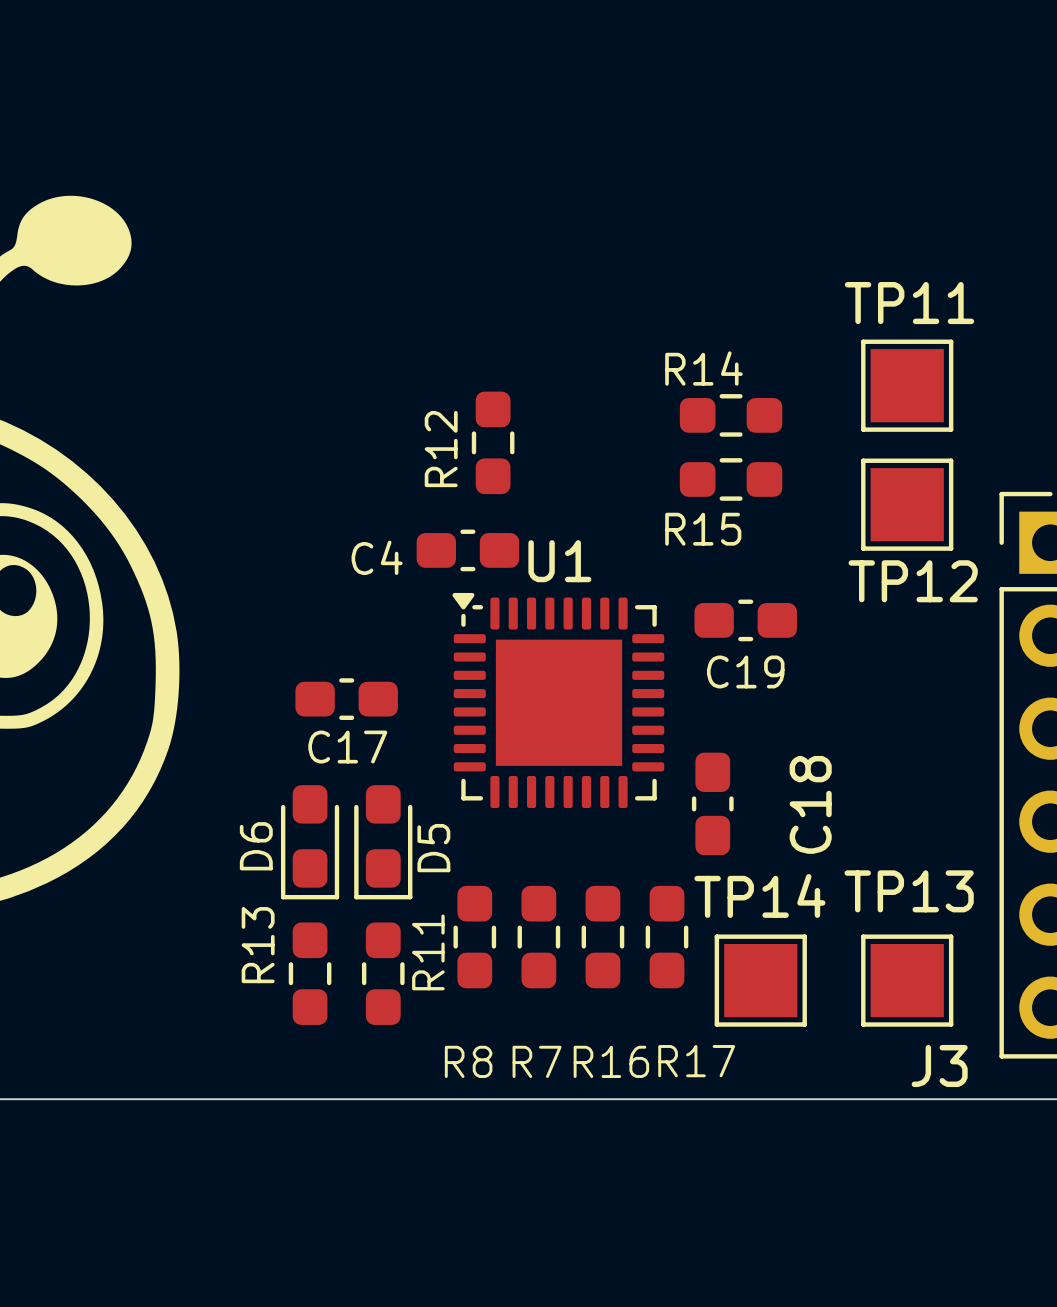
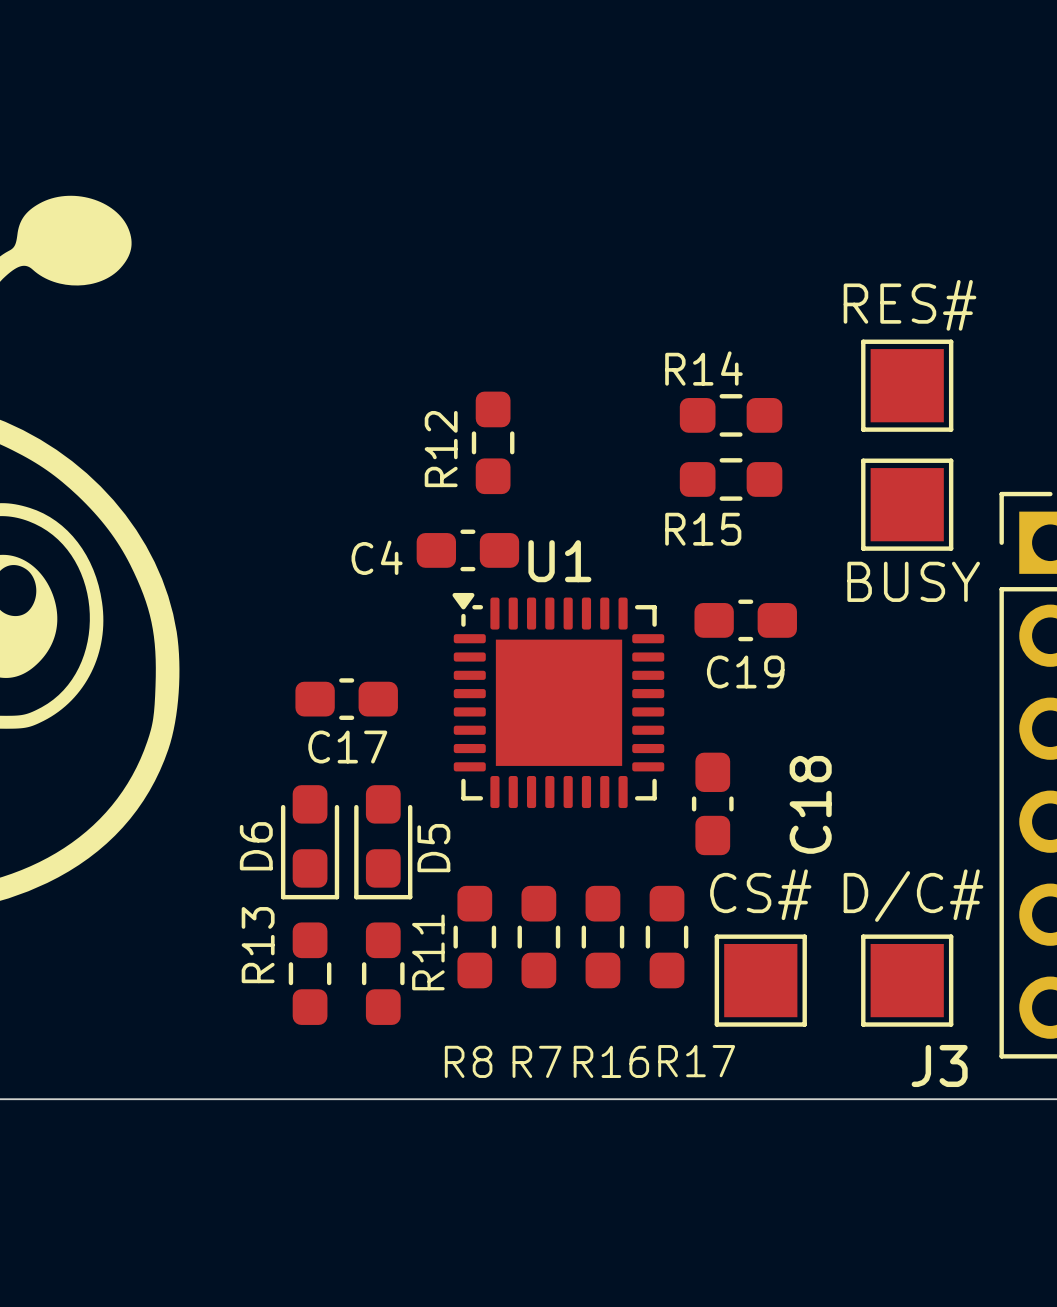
TP11 name: TP11 (909, 303) -> none
text: none -> RES# (910, 305)
TP12 name: TP12 (913, 581) -> none
text: none -> BUSY (913, 581)
TP13 name: TP13 (909, 891) -> none
text: none -> CS# (760, 894)
TP14 name: TP14 (759, 895) -> none
text: none -> D/C# (913, 895)

